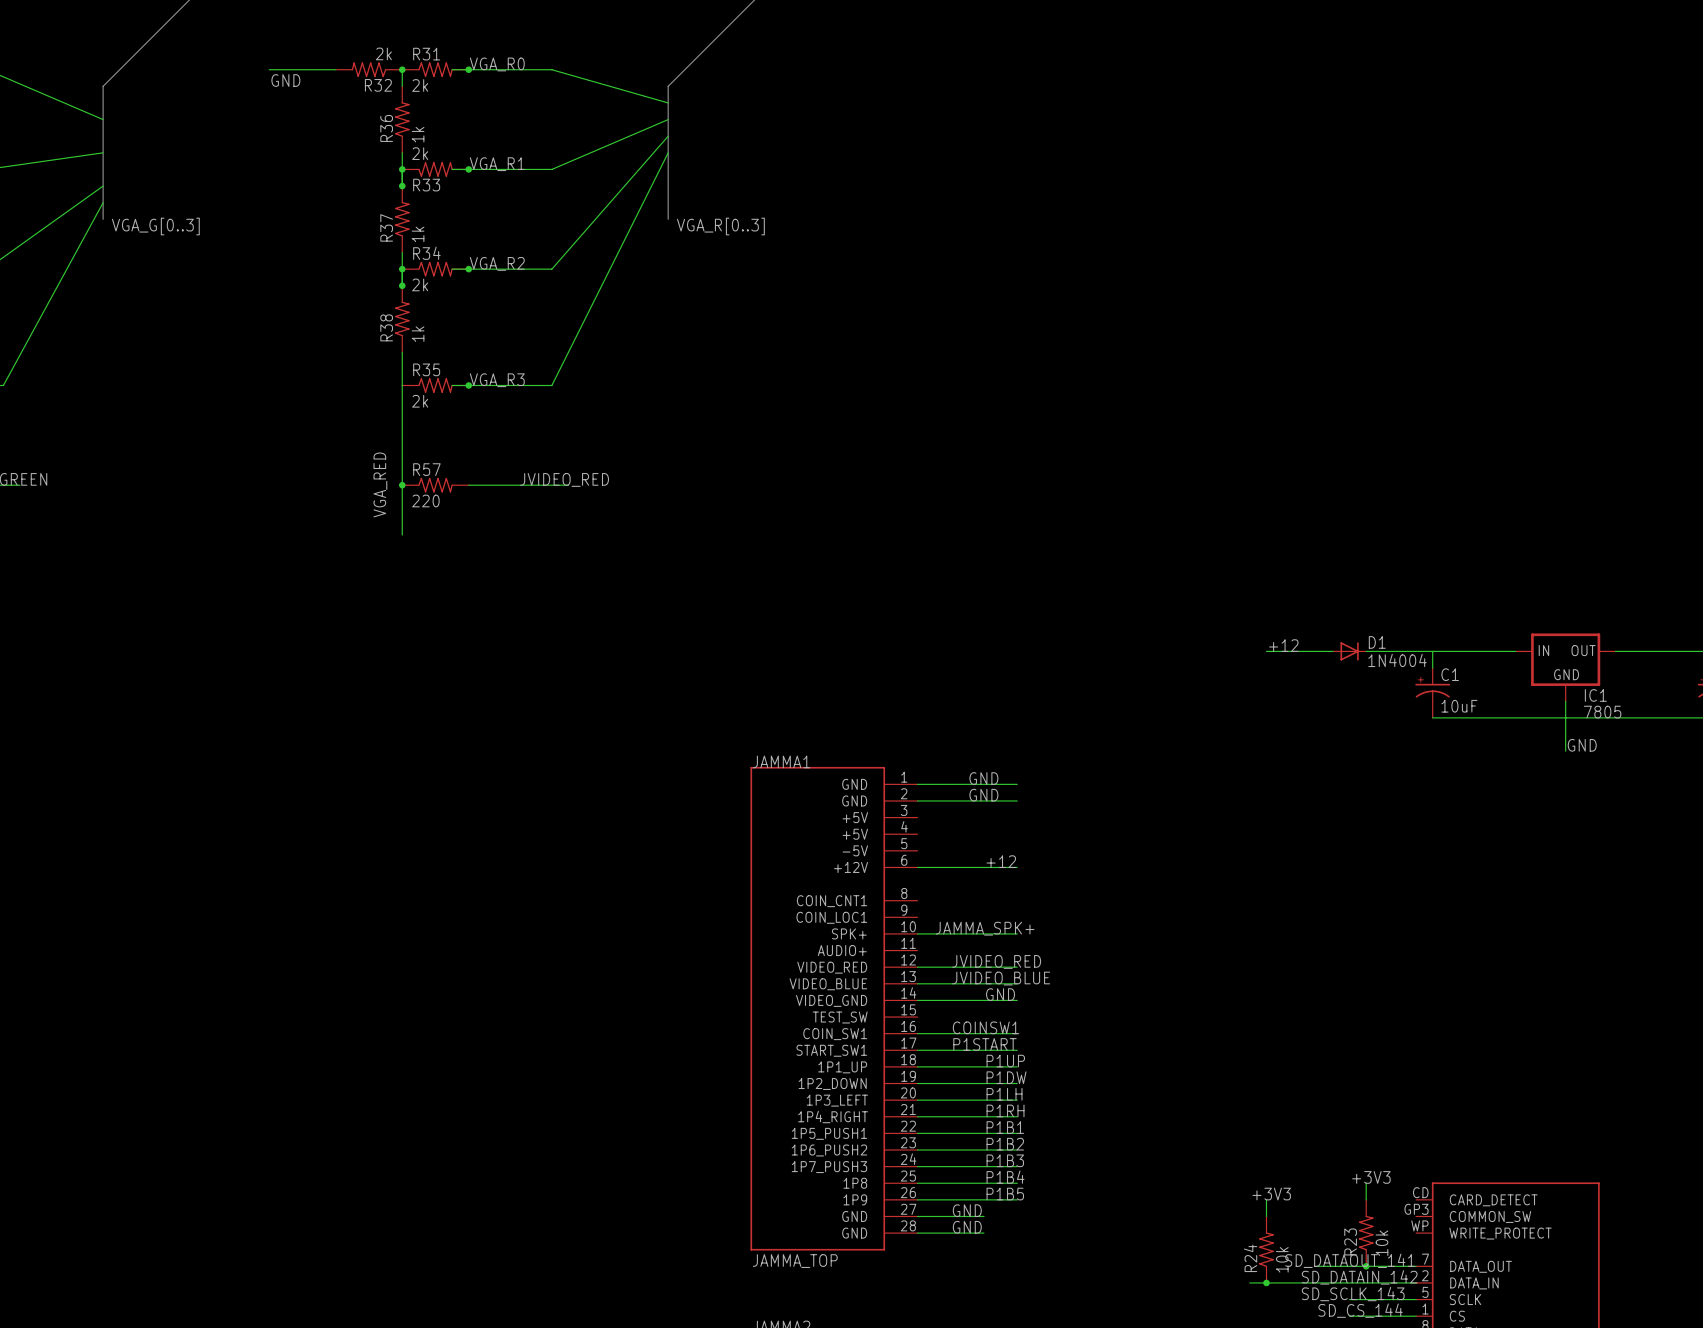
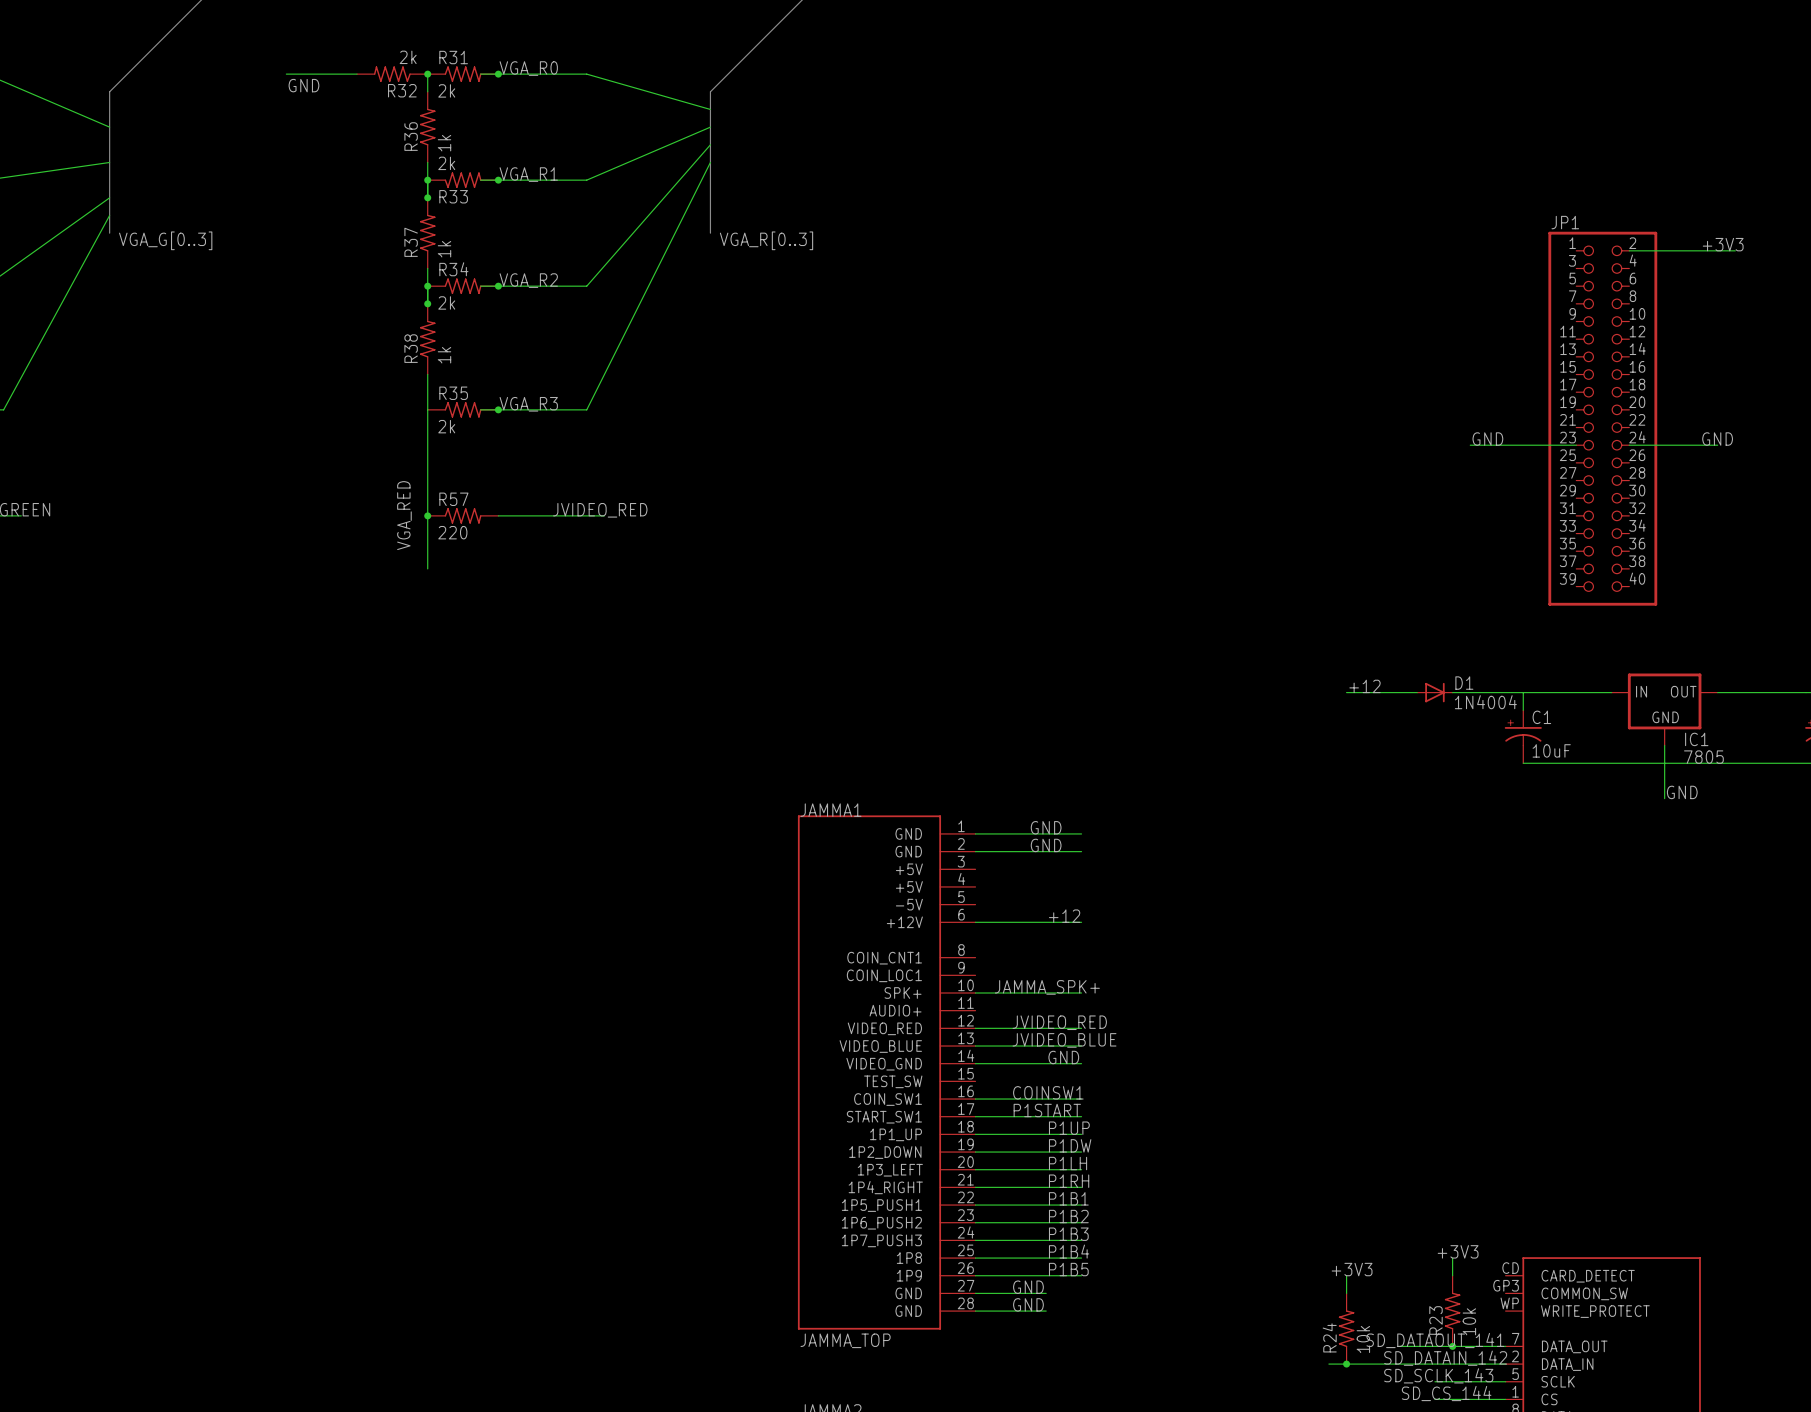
label: none -> +3V3 (1723, 244)
wire: none -> (1629, 250) (1735, 250)
JP1: none -> (1602, 418)
label: none -> GND (1487, 439)
label: none -> GND (1717, 439)
wire: none -> (1470, 445) (1576, 445)
wire: none -> (1629, 445) (1717, 445)

